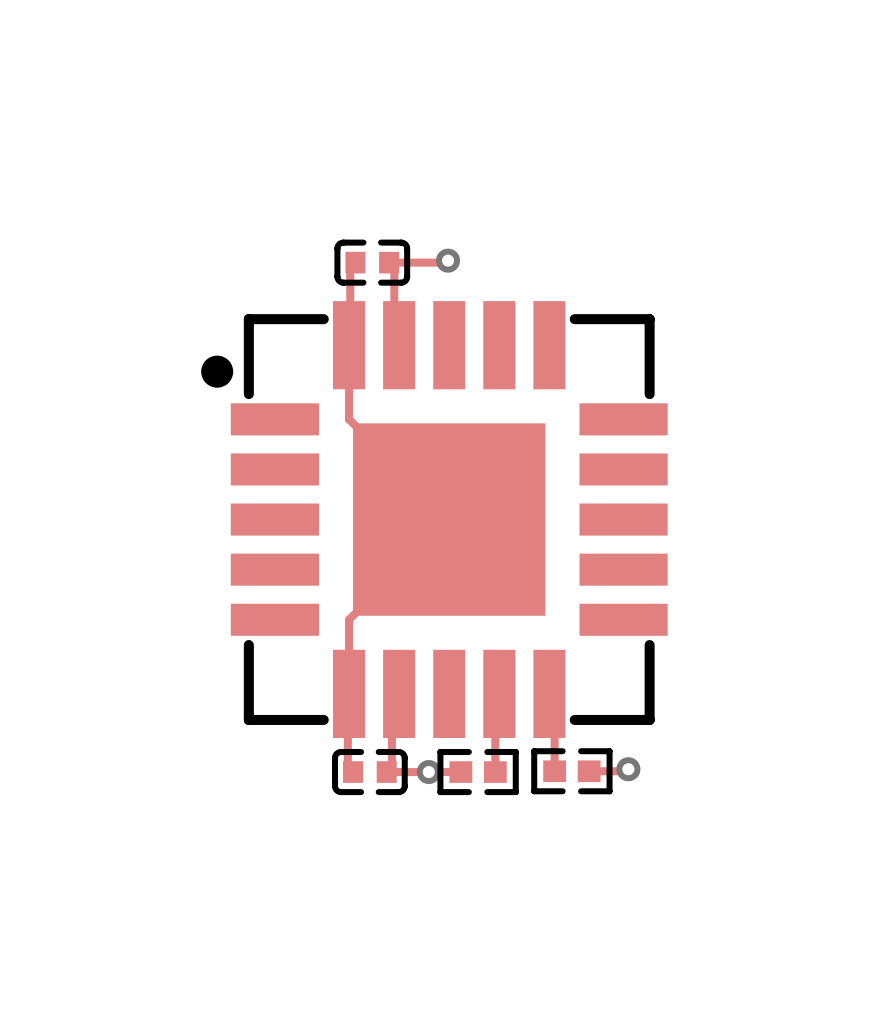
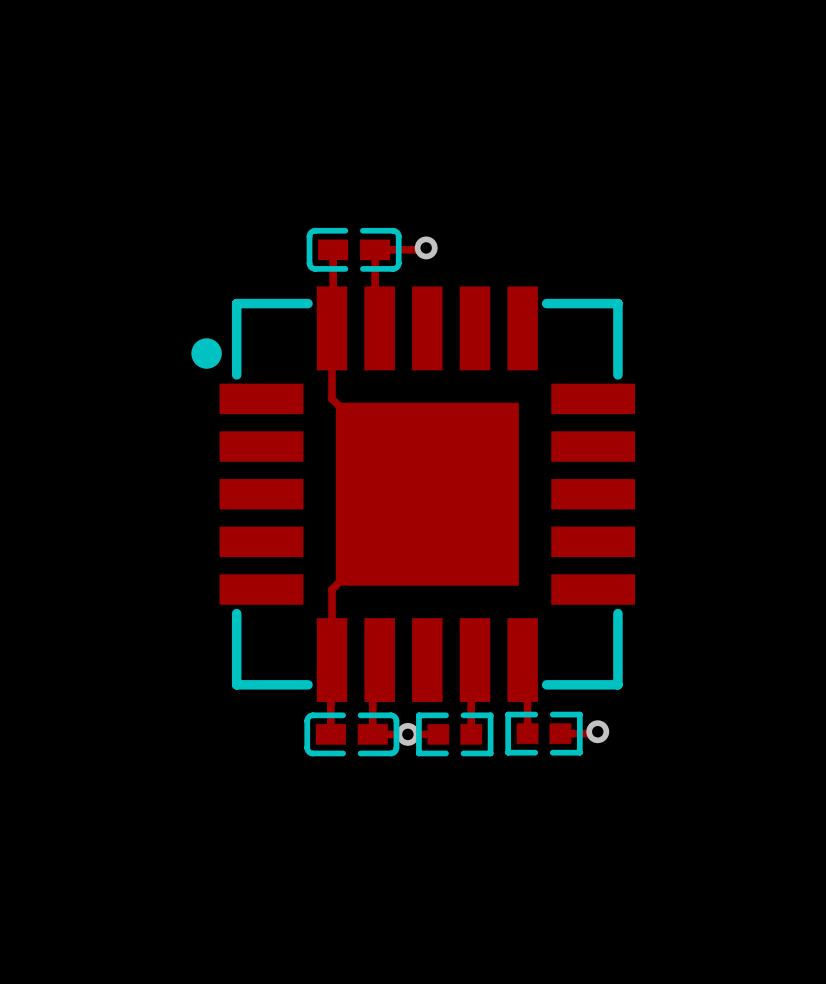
part footprint: [334, 239, 411, 286] -> [306, 227, 402, 272]
part footprint: [332, 749, 408, 796] -> [304, 712, 400, 757]

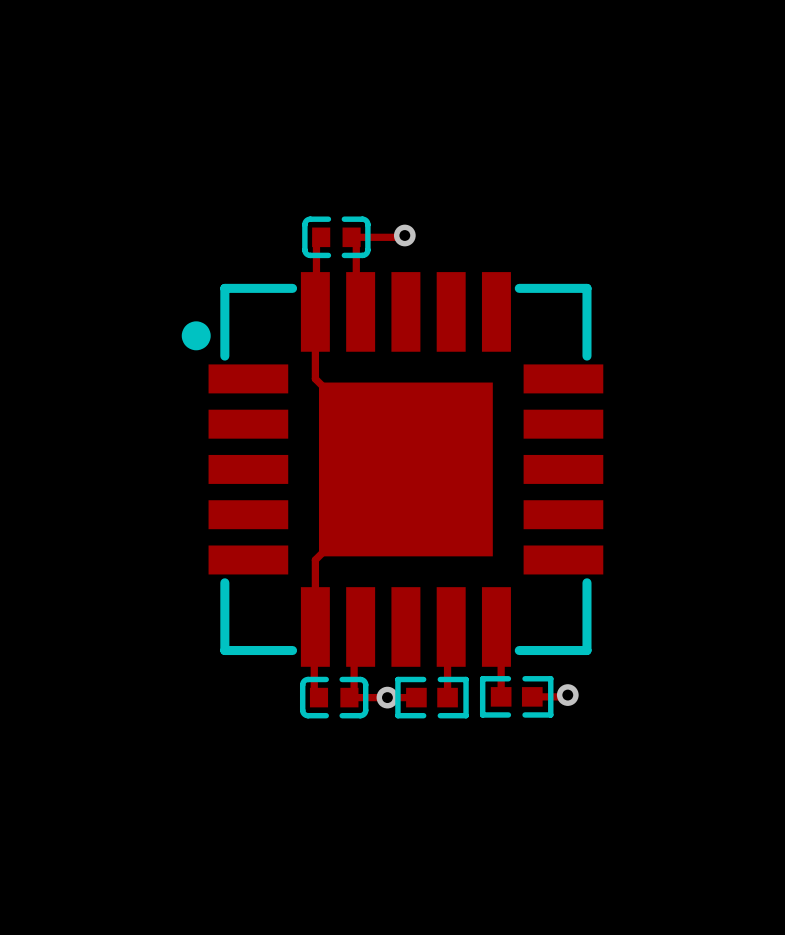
part footprint: [306, 227, 402, 272] -> [302, 216, 371, 259]
part footprint: [304, 712, 400, 757] -> [299, 676, 369, 719]

